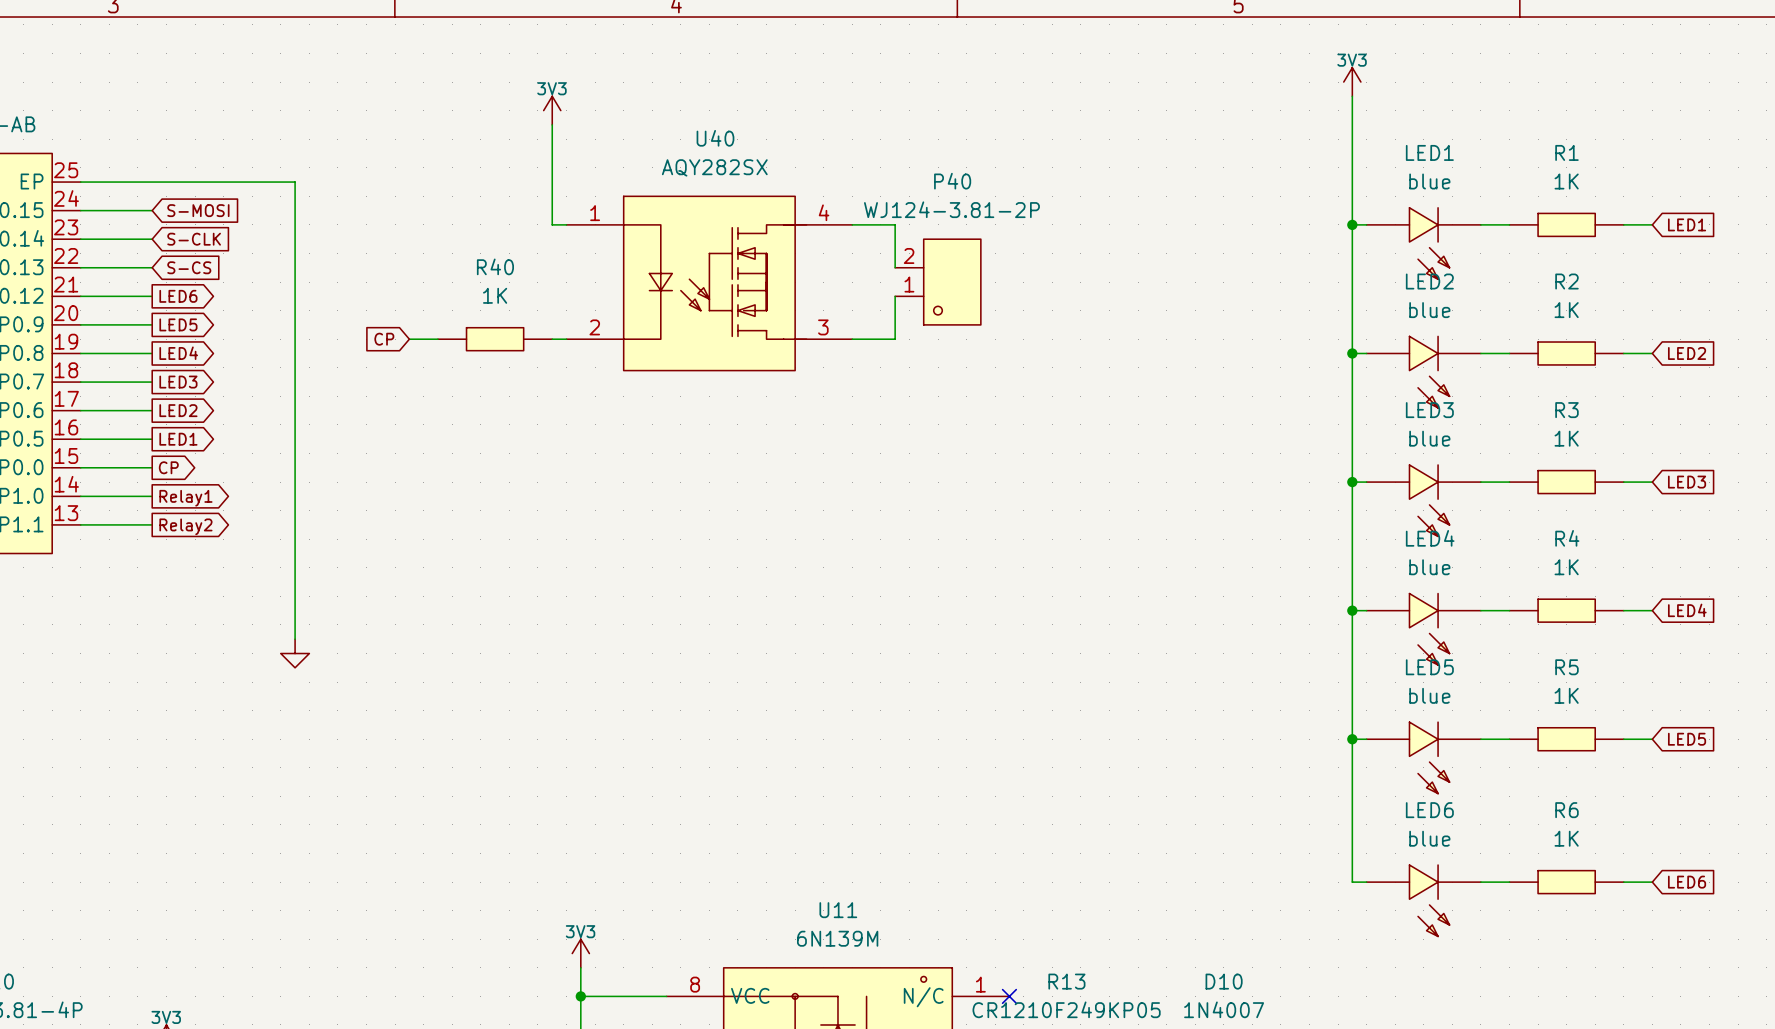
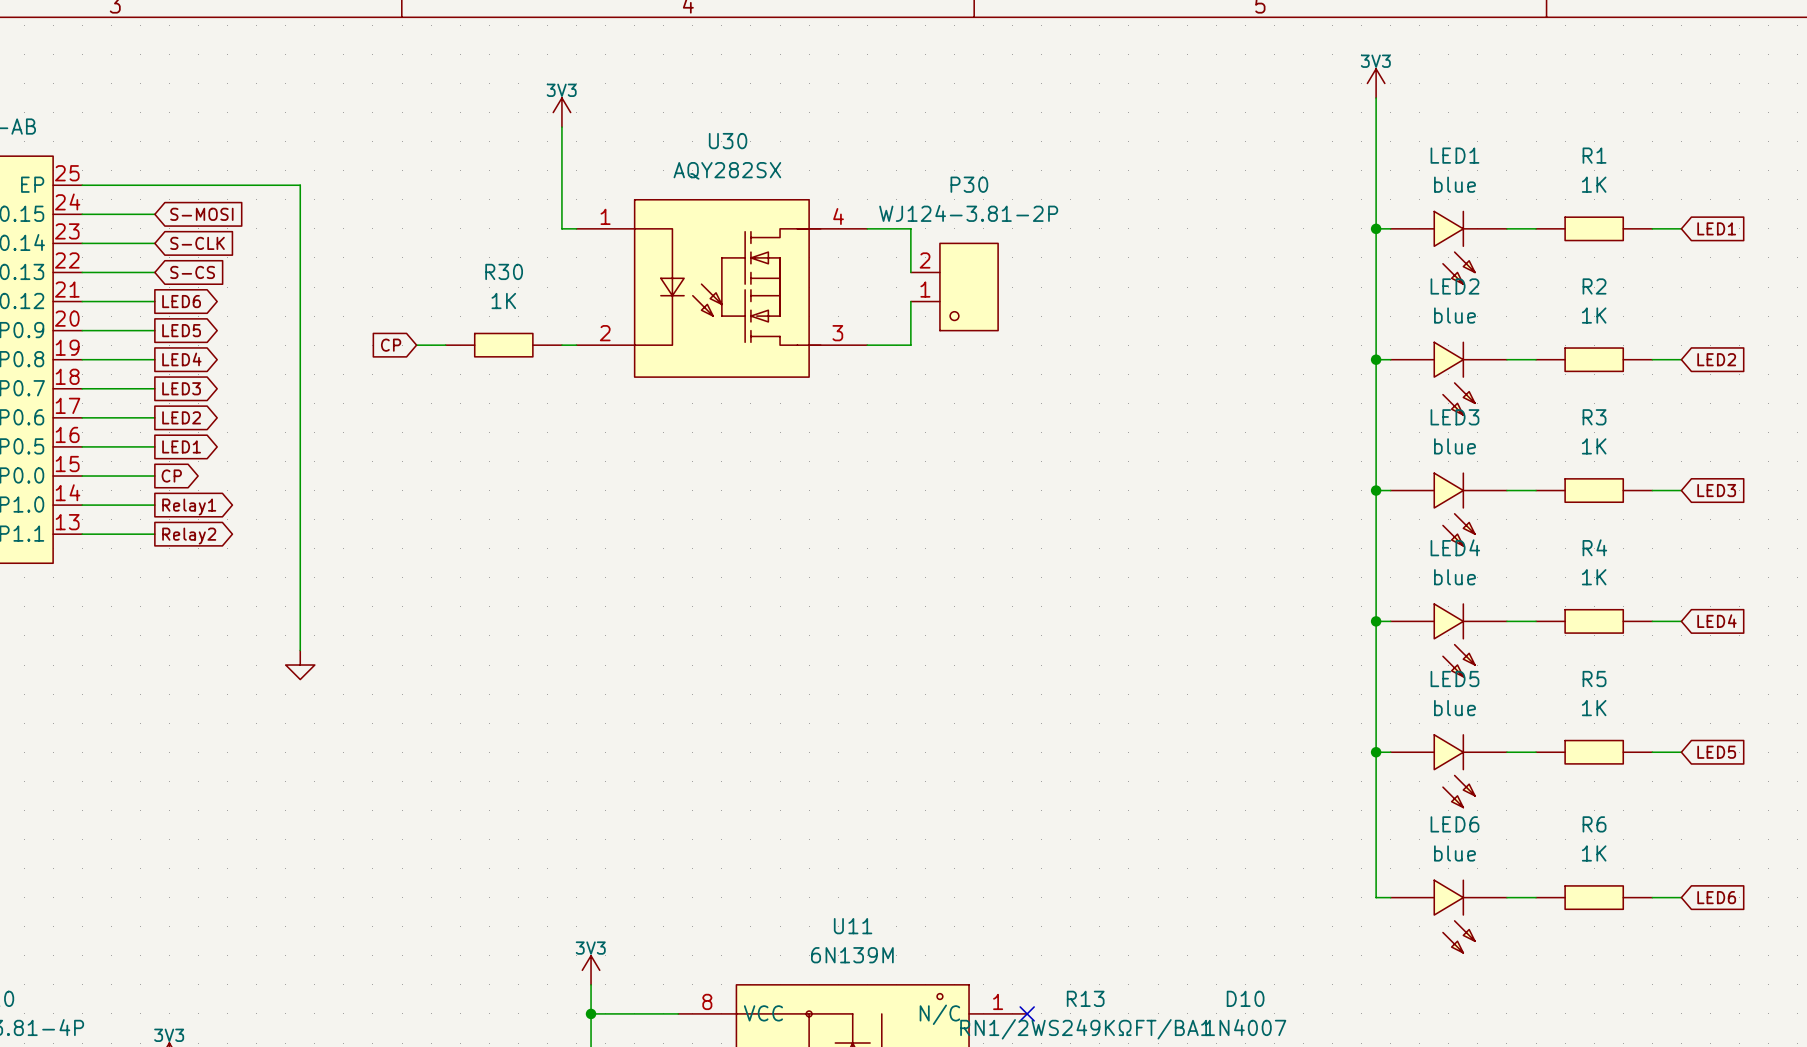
U40 name: U40 (715, 138) -> U30 (728, 141)
P40 name: P40 (952, 181) -> P30 (969, 184)
R40 name: R40 (495, 266) -> R30 (504, 271)
R13 value: CR1210F249KP05 (1066, 1009) -> RN1/2WS249KΩFT/BA1 (1085, 1029)

